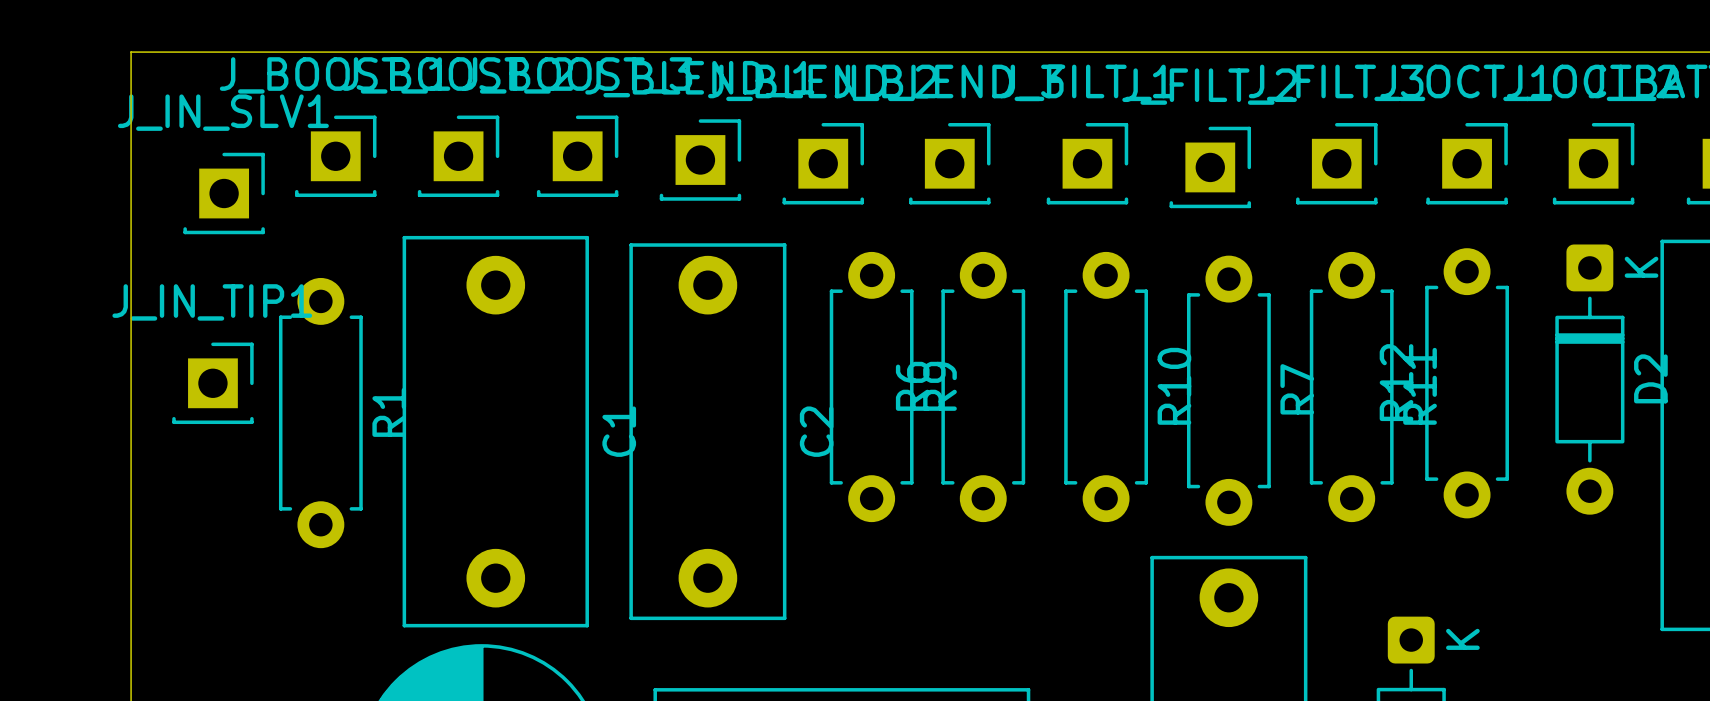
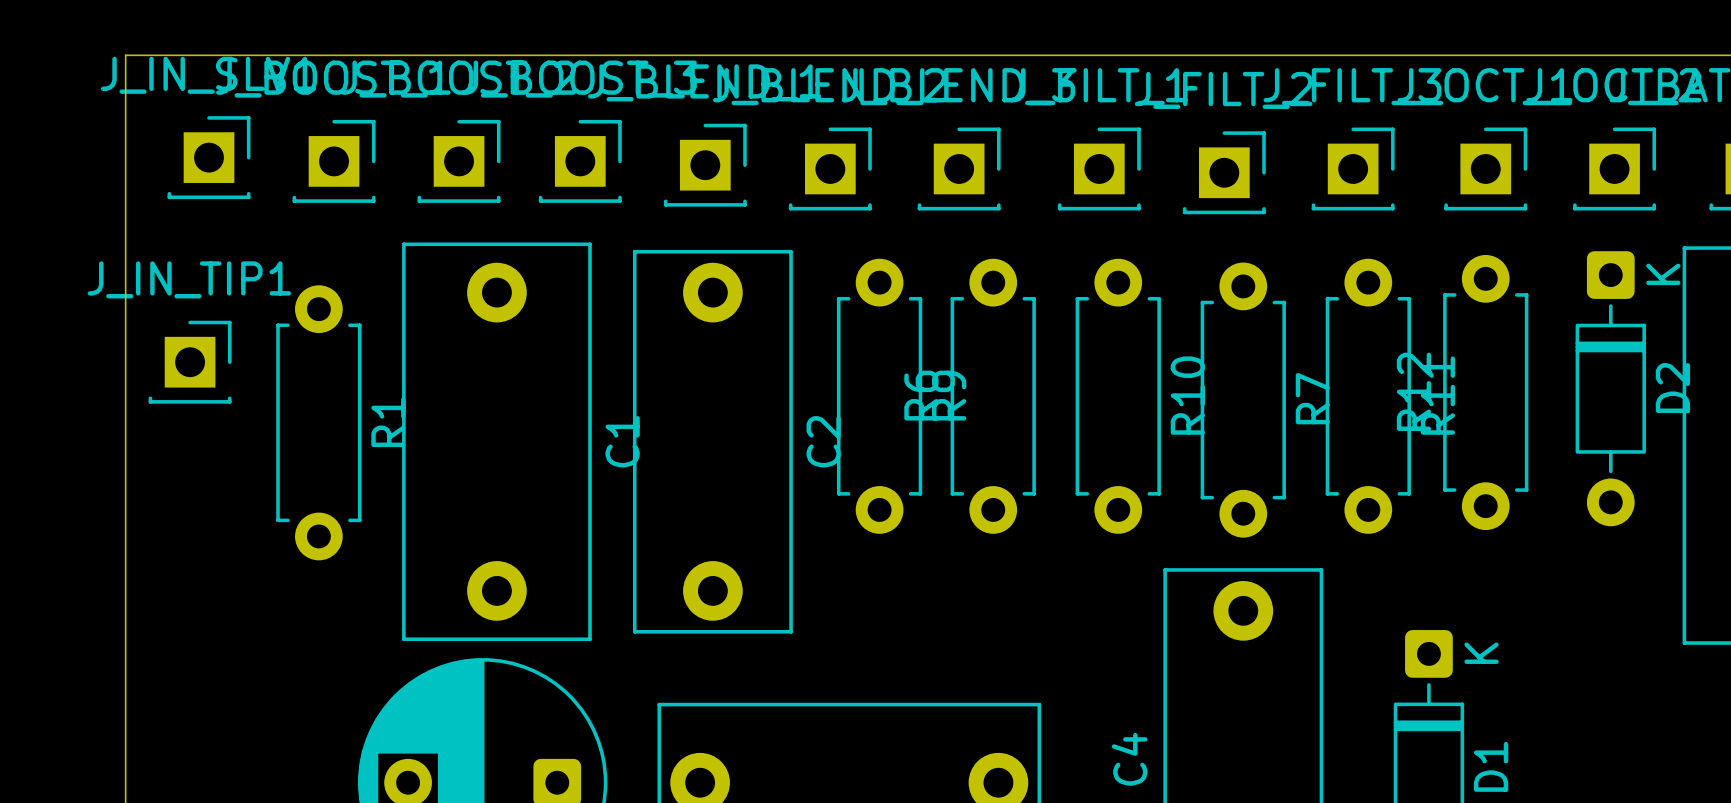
J_IN_SLV1 position: (224, 193) -> (209, 157)
J_IN_TIP1 position: (212, 383) -> (190, 362)

